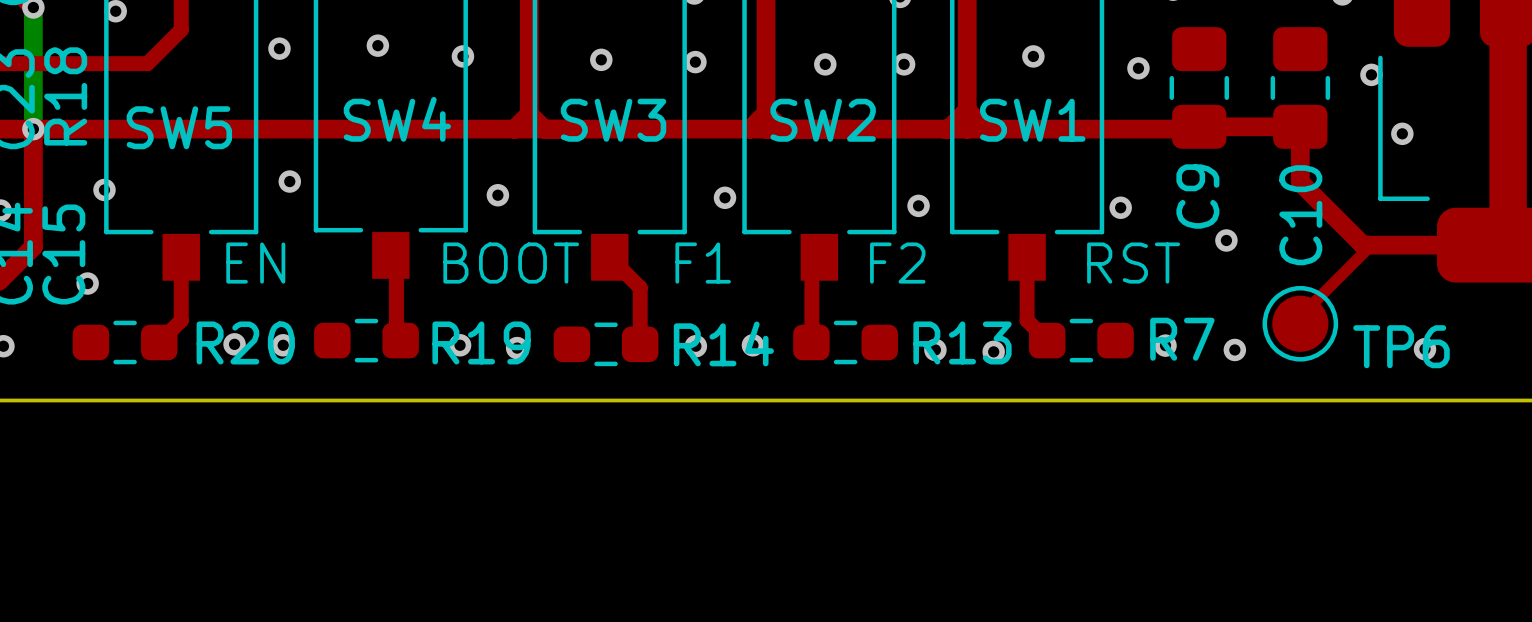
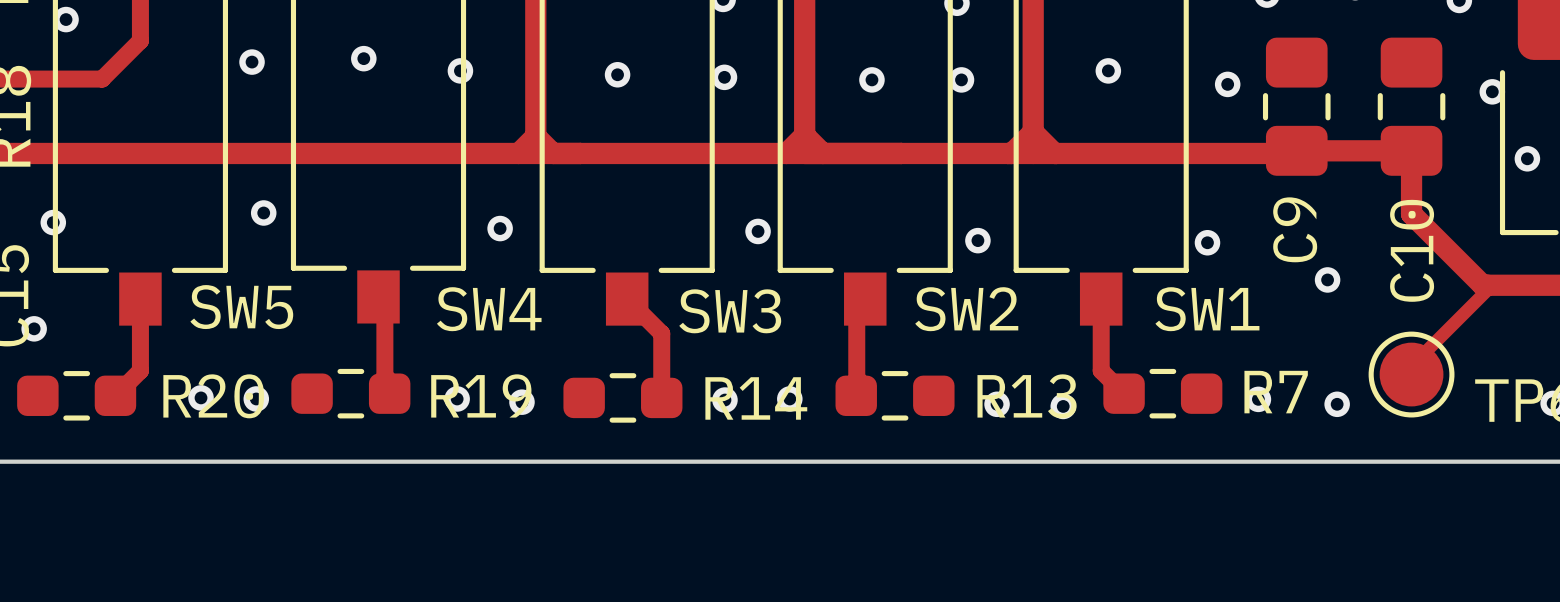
SW4 name position: SW4 (397, 119) -> SW4 (489, 309)
SW3 name position: SW3 (613, 120) -> SW3 (730, 311)
SW2 name position: SW2 (823, 120) -> SW2 (966, 309)
SW1 name position: SW1 (1032, 120) -> SW1 (1207, 309)
SW5 name position: SW5 (179, 127) -> SW5 (241, 307)
text: EN (255, 263) -> none
text: BOOT (511, 263) -> none
text: F1 (703, 263) -> none
text: F2 (897, 263) -> none
text: RST (1133, 263) -> none

